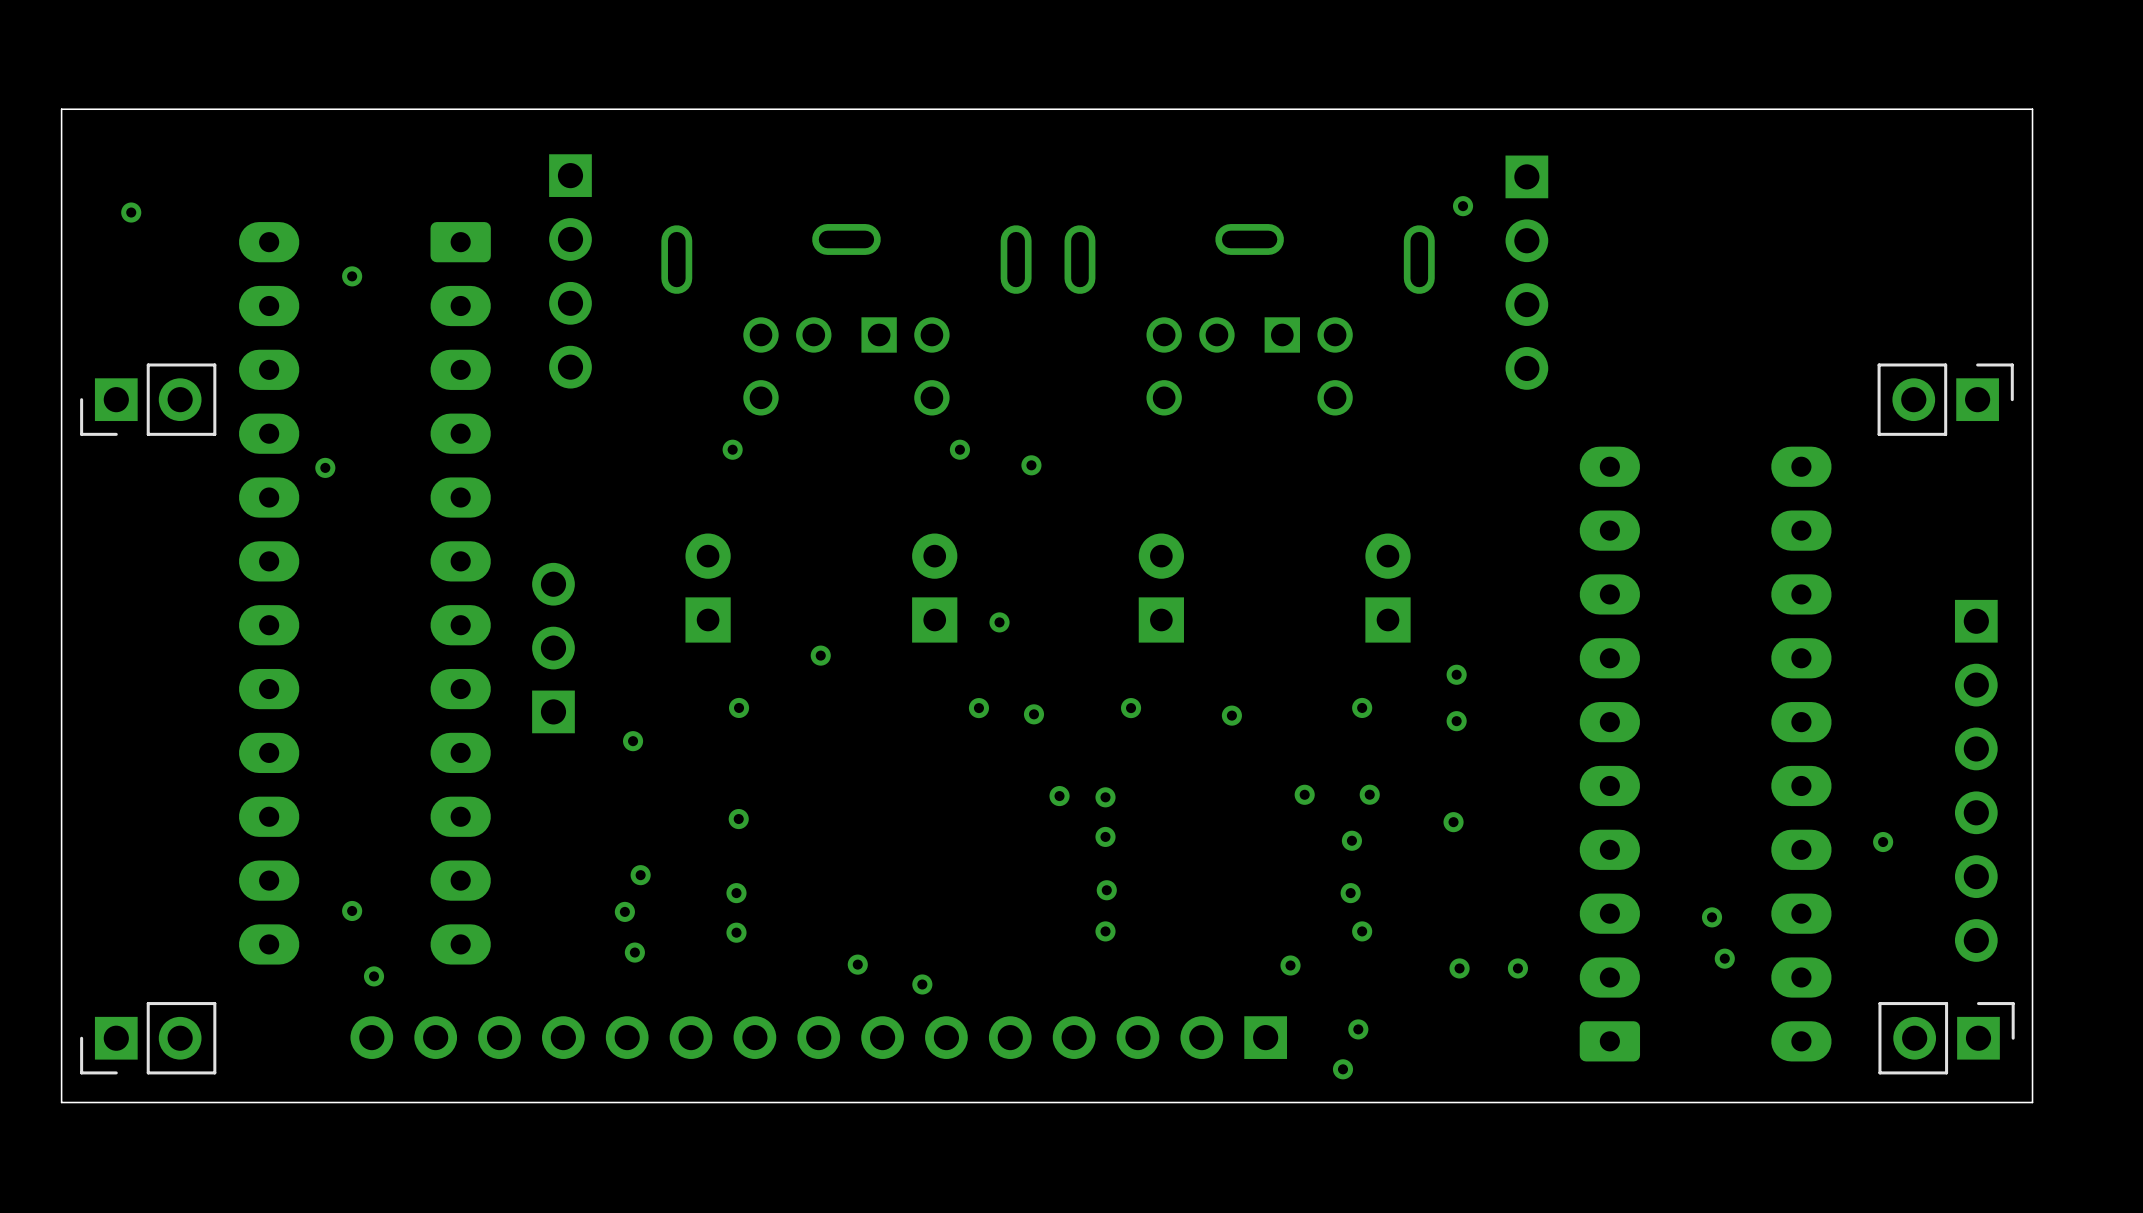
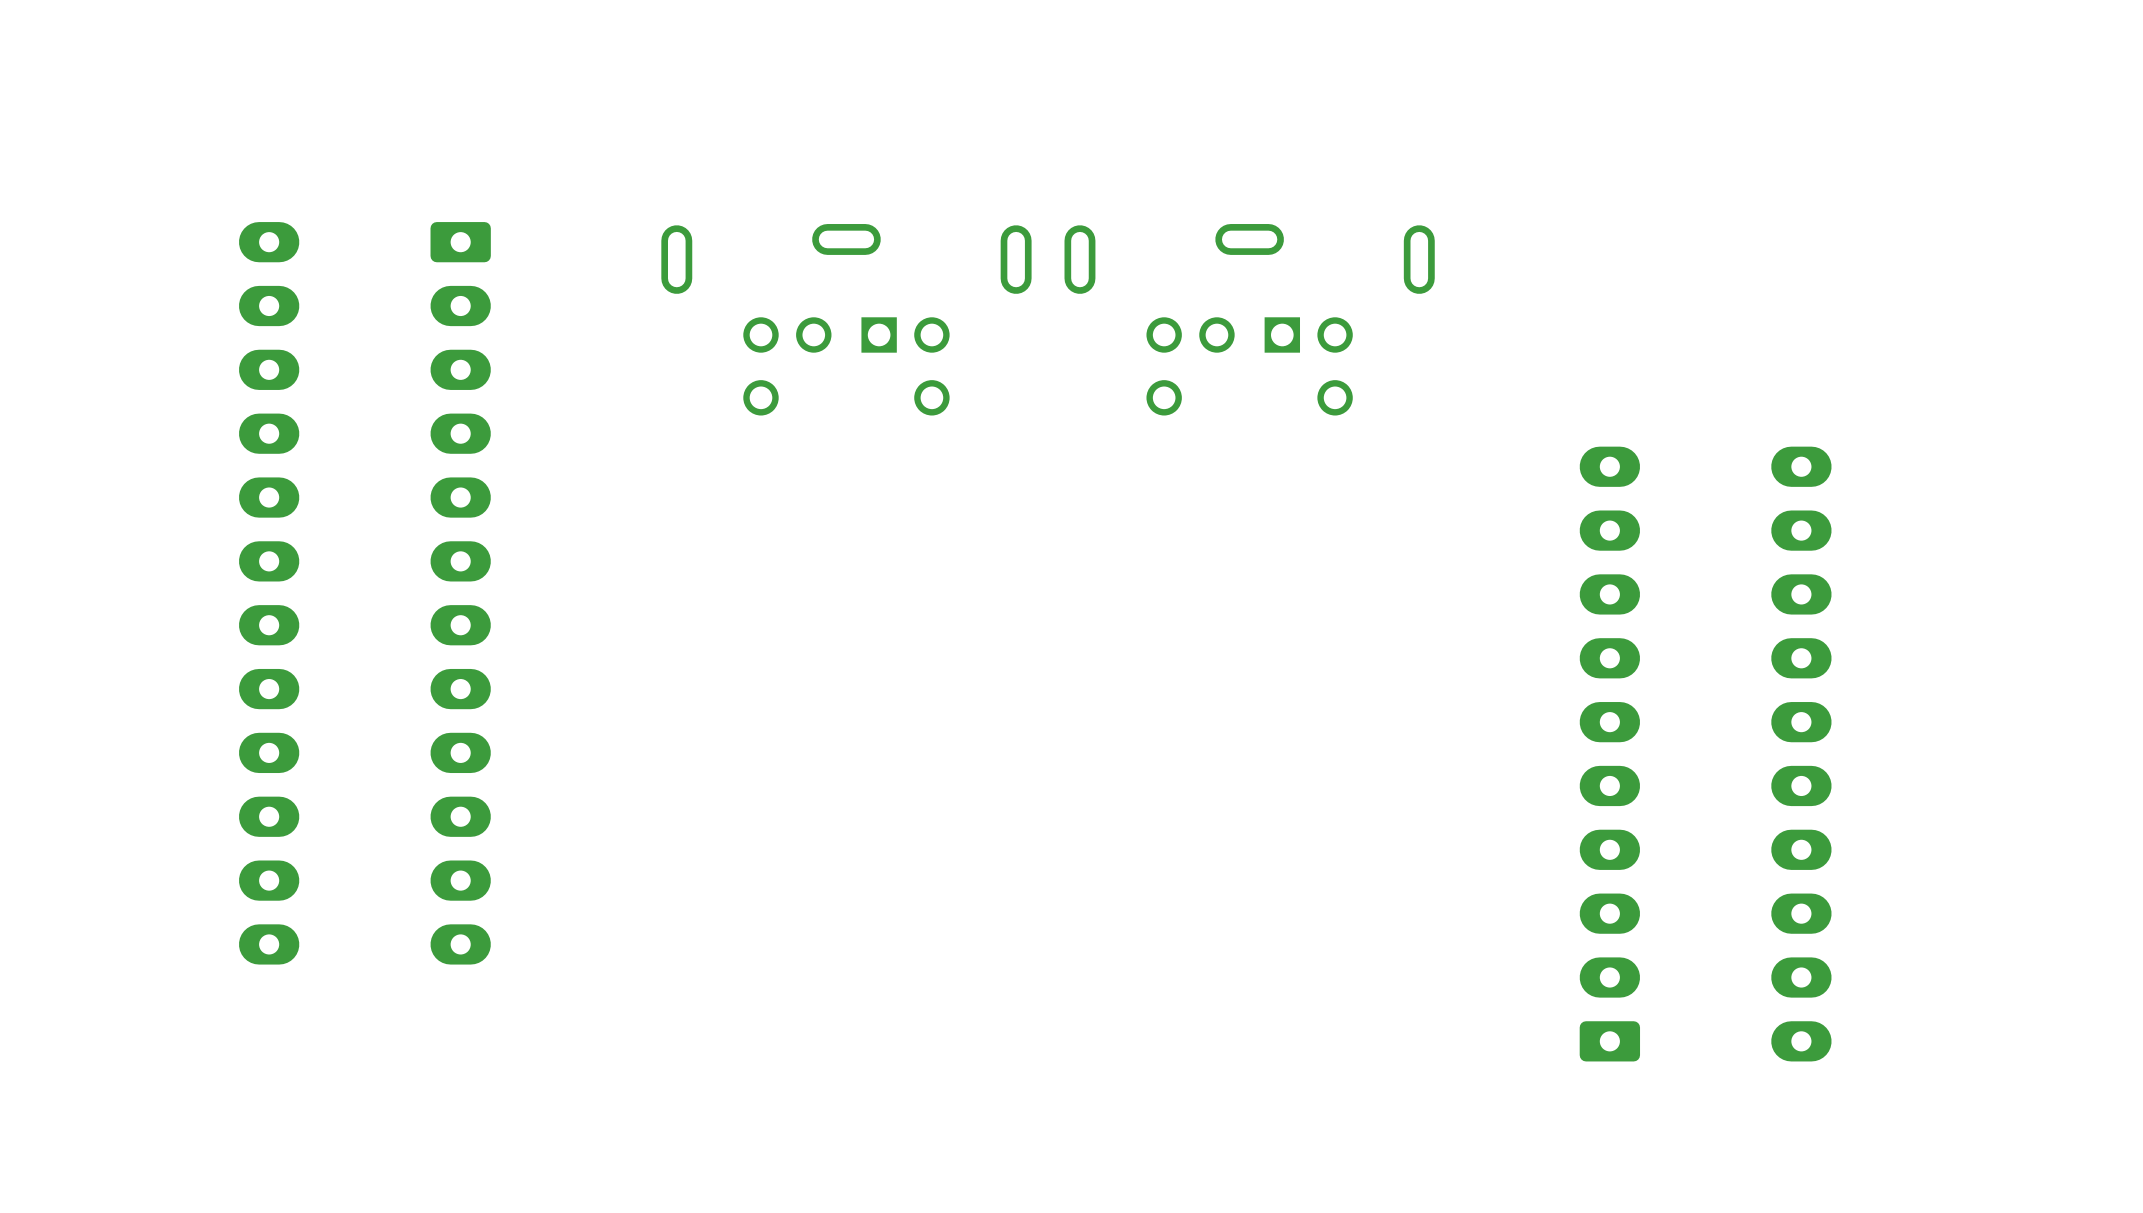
board edge: (2032, 109) (61, 109) (61, 1102) (2032, 1102) (2032, 109) -> none
via: (1463, 206) -> none
via: (131, 212) -> none
part: (570, 271) -> none
part: (1526, 272) -> none
via: (352, 276) -> none
part: (148, 399) -> none
part: (1945, 399) -> none
via: (732, 449) -> none
via: (959, 449) -> none
via: (1031, 465) -> none
via: (325, 467) -> none
part: (708, 588) -> none
part: (934, 588) -> none
part: (1161, 588) -> none
part: (1388, 588) -> none
via: (999, 622) -> none
part: (553, 648) -> none
via: (820, 655) -> none
via: (1456, 674) -> none
via: (739, 707) -> none
via: (1362, 707) -> none
via: (978, 708) -> none
via: (1131, 708) -> none
via: (1033, 714) -> none
via: (1231, 715) -> none
via: (1456, 721) -> none
via: (633, 741) -> none
part: (1976, 780) -> none
via: (1304, 794) -> none
via: (1369, 794) -> none
via: (1059, 796) -> none
via: (1105, 797) -> none
via: (738, 819) -> none
via: (1453, 822) -> none
via: (1105, 836) -> none
via: (1351, 840) -> none
via: (1883, 842) -> none
via: (640, 875) -> none
via: (1106, 890) -> none
via: (736, 893) -> none
via: (1350, 893) -> none
via: (352, 910) -> none
via: (624, 911) -> none
via: (1712, 917) -> none
via: (1105, 931) -> none
via: (1362, 931) -> none
via: (736, 932) -> none
via: (634, 952) -> none
via: (1724, 958) -> none
via: (857, 964) -> none
via: (1290, 965) -> none
via: (1459, 968) -> none
via: (1517, 968) -> none
via: (374, 976) -> none
via: (922, 984) -> none
via: (1358, 1029) -> none
part: (818, 1037) -> none
part: (148, 1038) -> none
part: (1946, 1038) -> none
via: (1343, 1069) -> none

